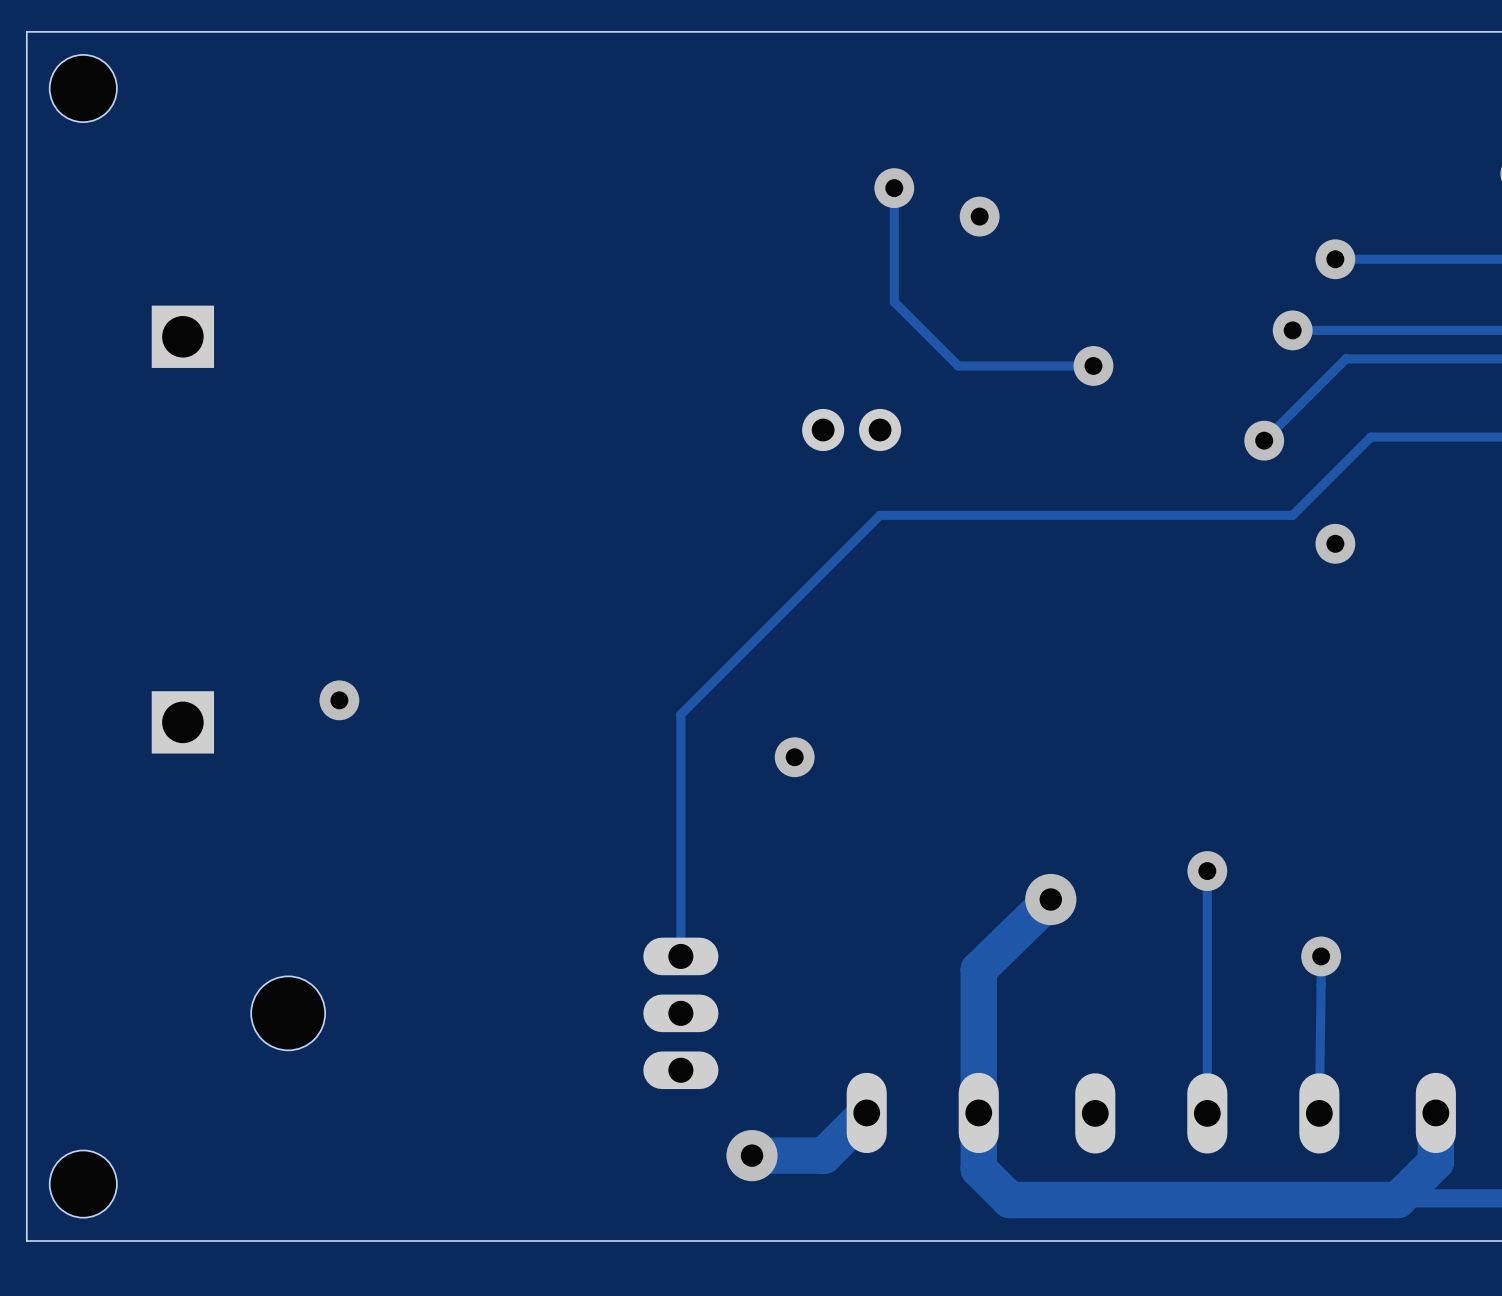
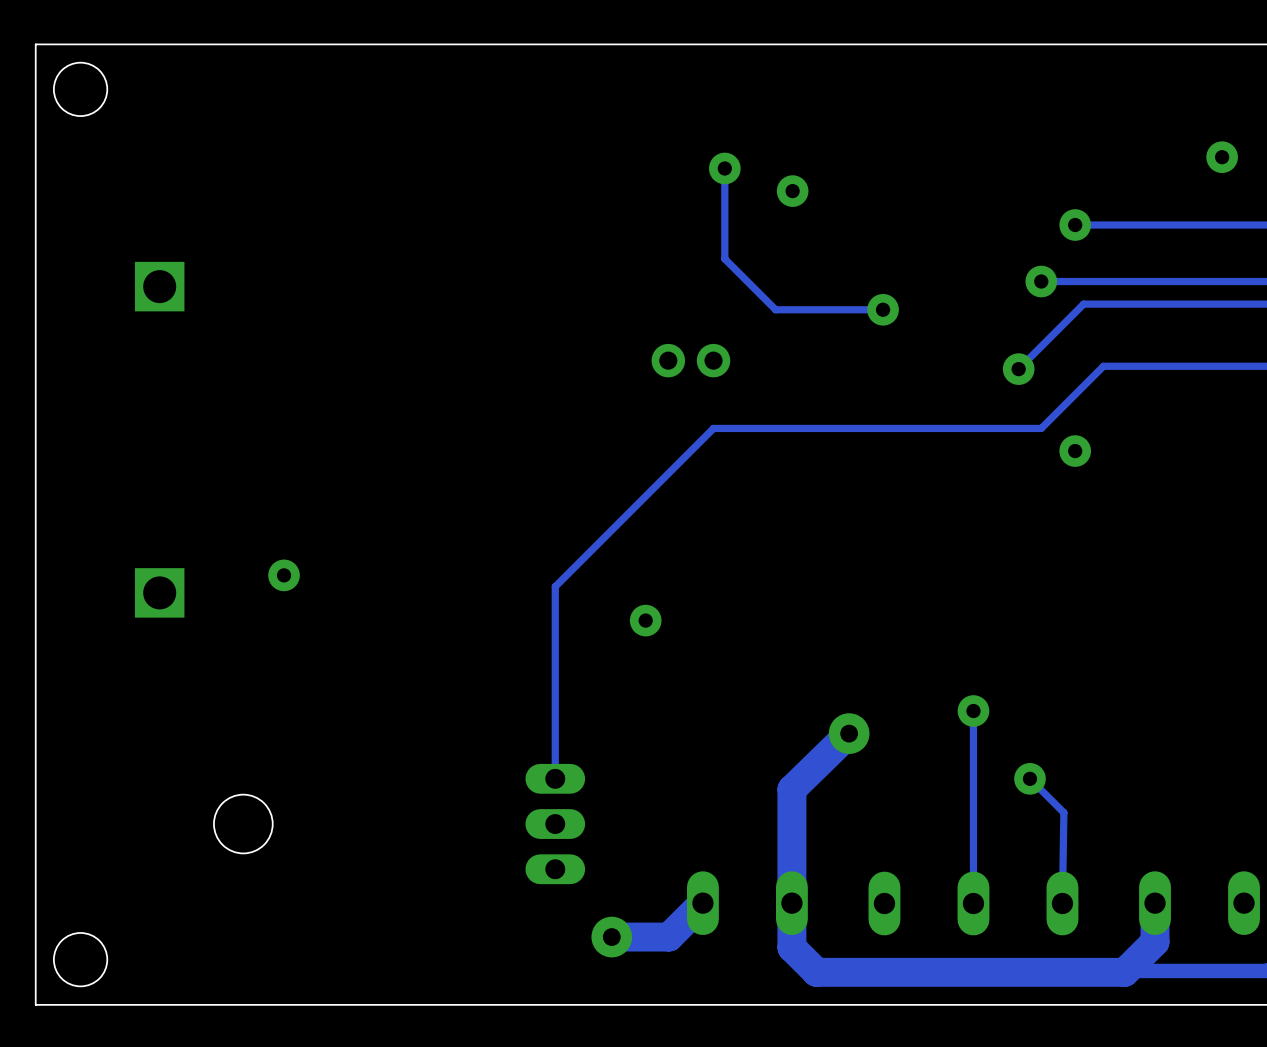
track: (1321, 956) (1319, 1111) -> (1029, 778) (1063, 812) (1062, 901)
via position: (1321, 956) -> (1029, 778)

